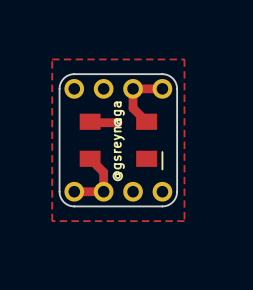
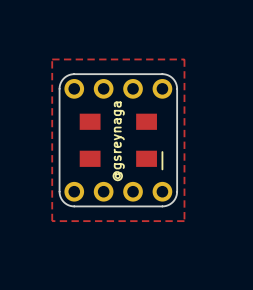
track: (162, 88) (133, 88) (133, 108) (146, 121) -> none
track: (91, 122) (118, 122) -> none
via: (118, 122) -> none
track: (90, 158) (103, 172) (103, 191) (74, 191) -> none

